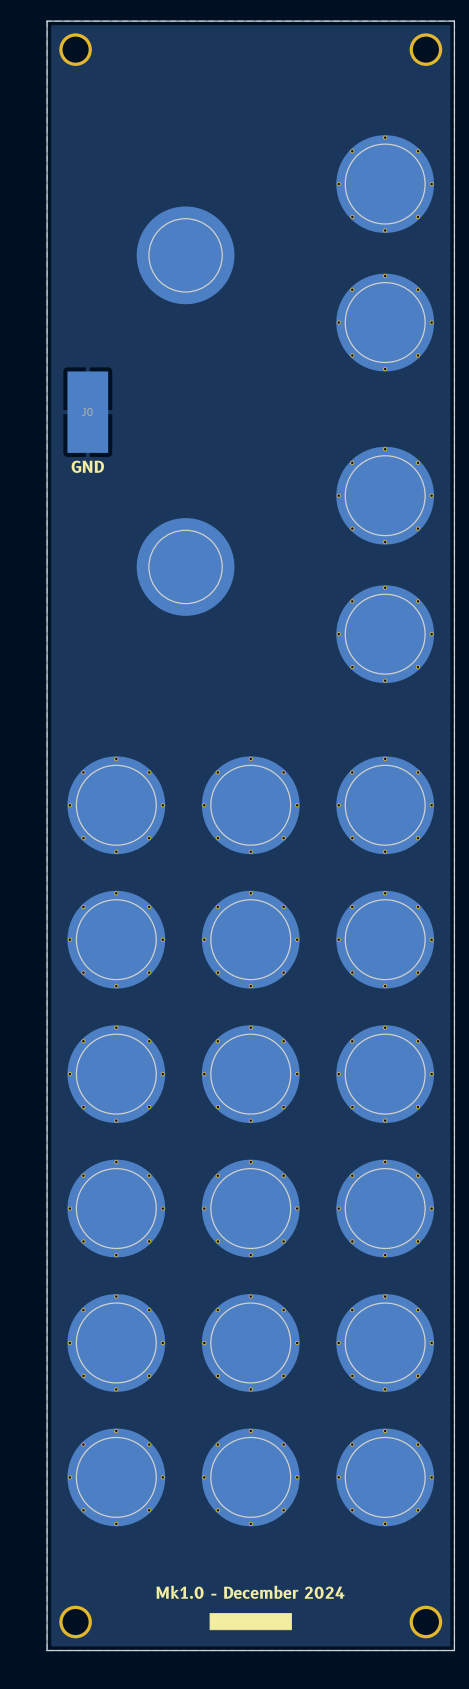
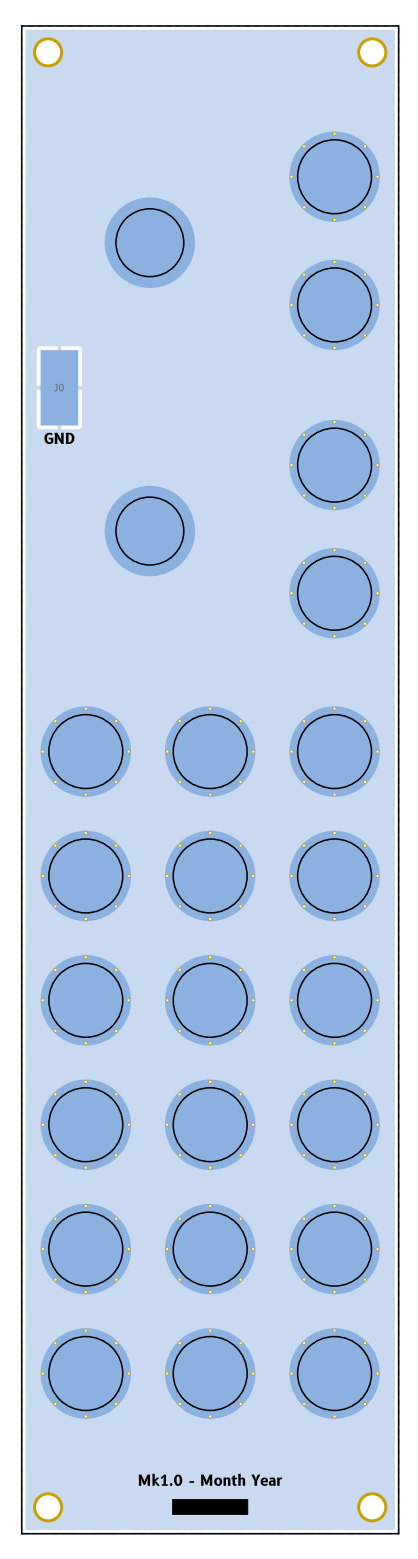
text: Mk1.0 - December 2024 (250, 1592) -> Mk1.0 - Month Year (210, 1479)

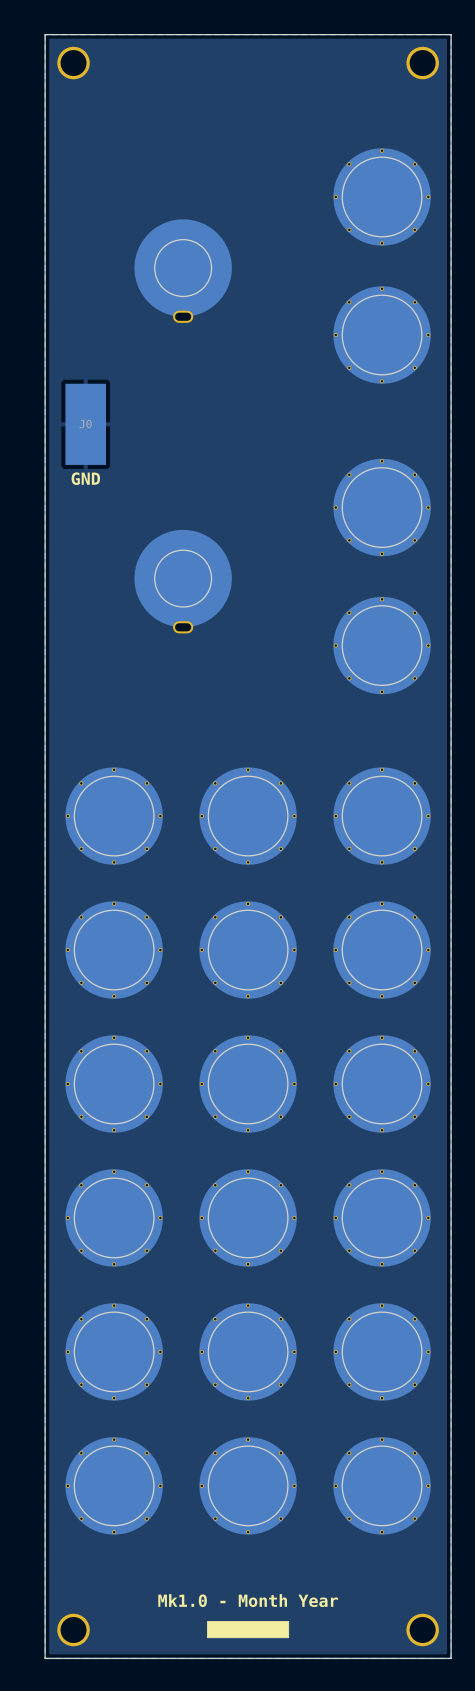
part footprint: [104, 197, 196, 288] -> [134, 219, 232, 323]
part footprint: [104, 485, 196, 577] -> [134, 529, 232, 634]

